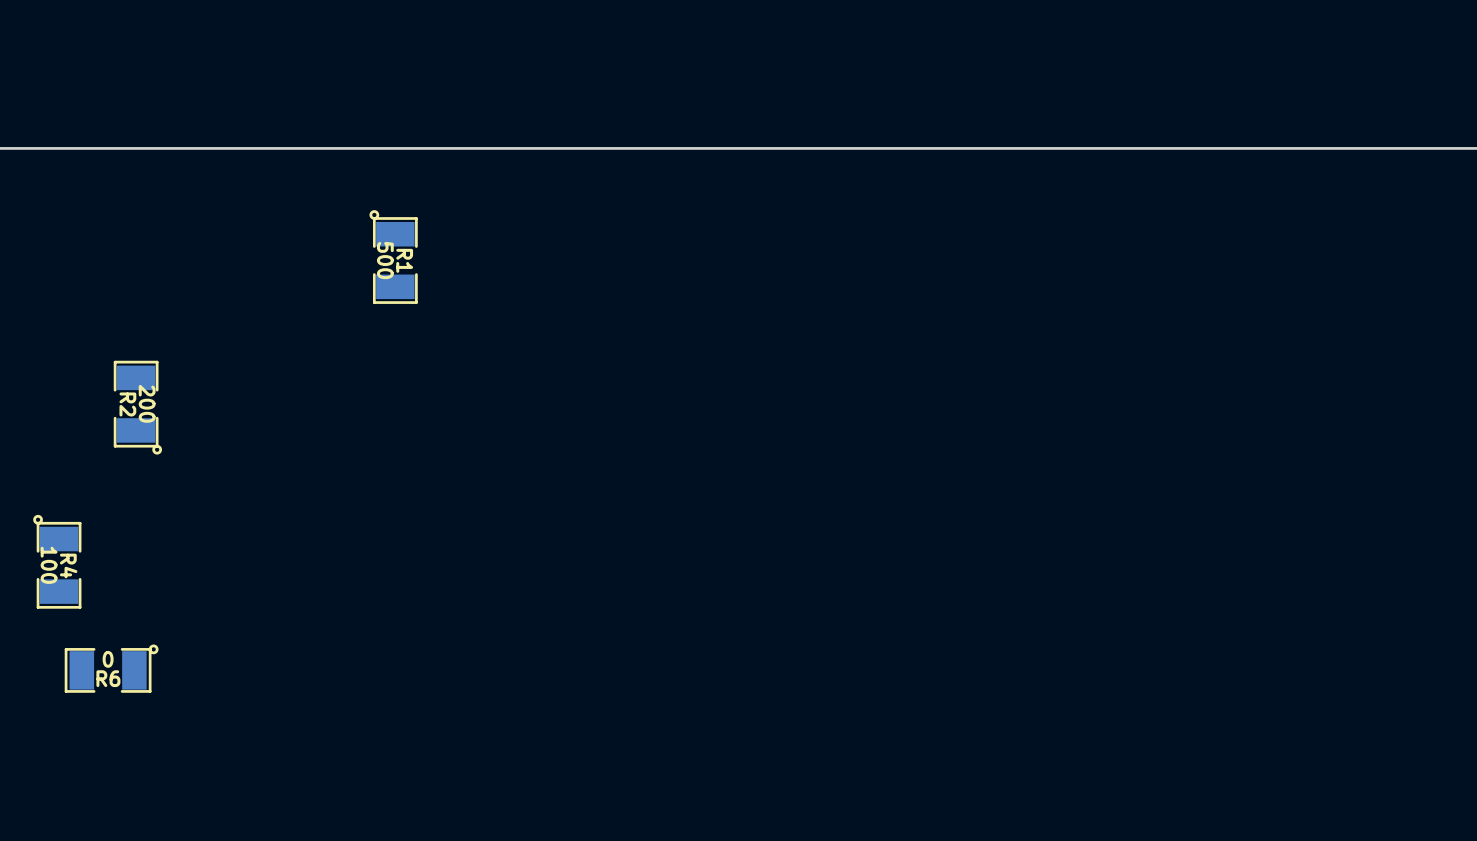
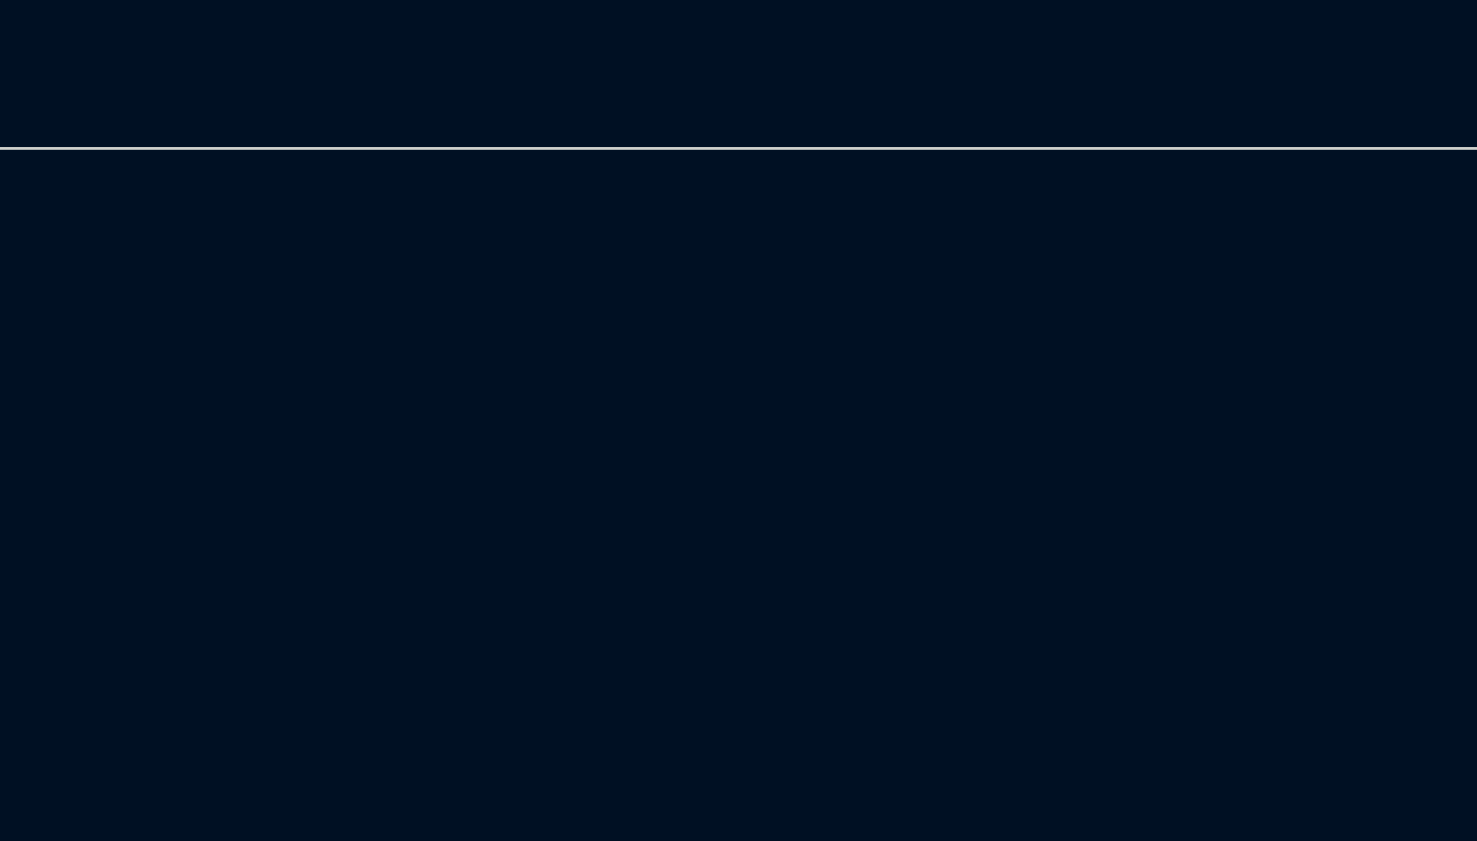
R1: 500 (393, 257) -> none
R2: 200 (137, 407) -> none
R4: 100 (57, 561) -> none
R6: 0 (111, 668) -> none

